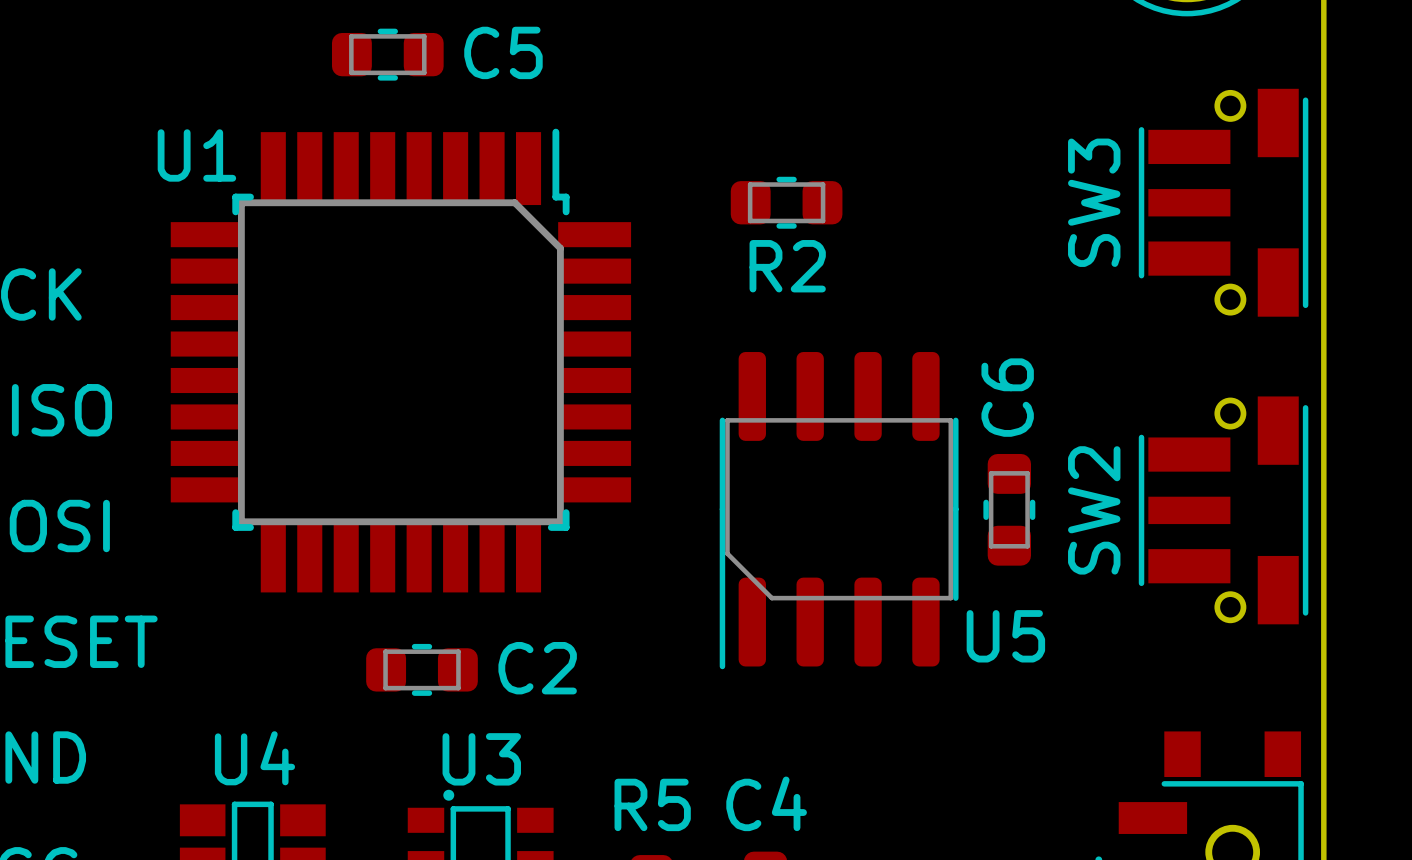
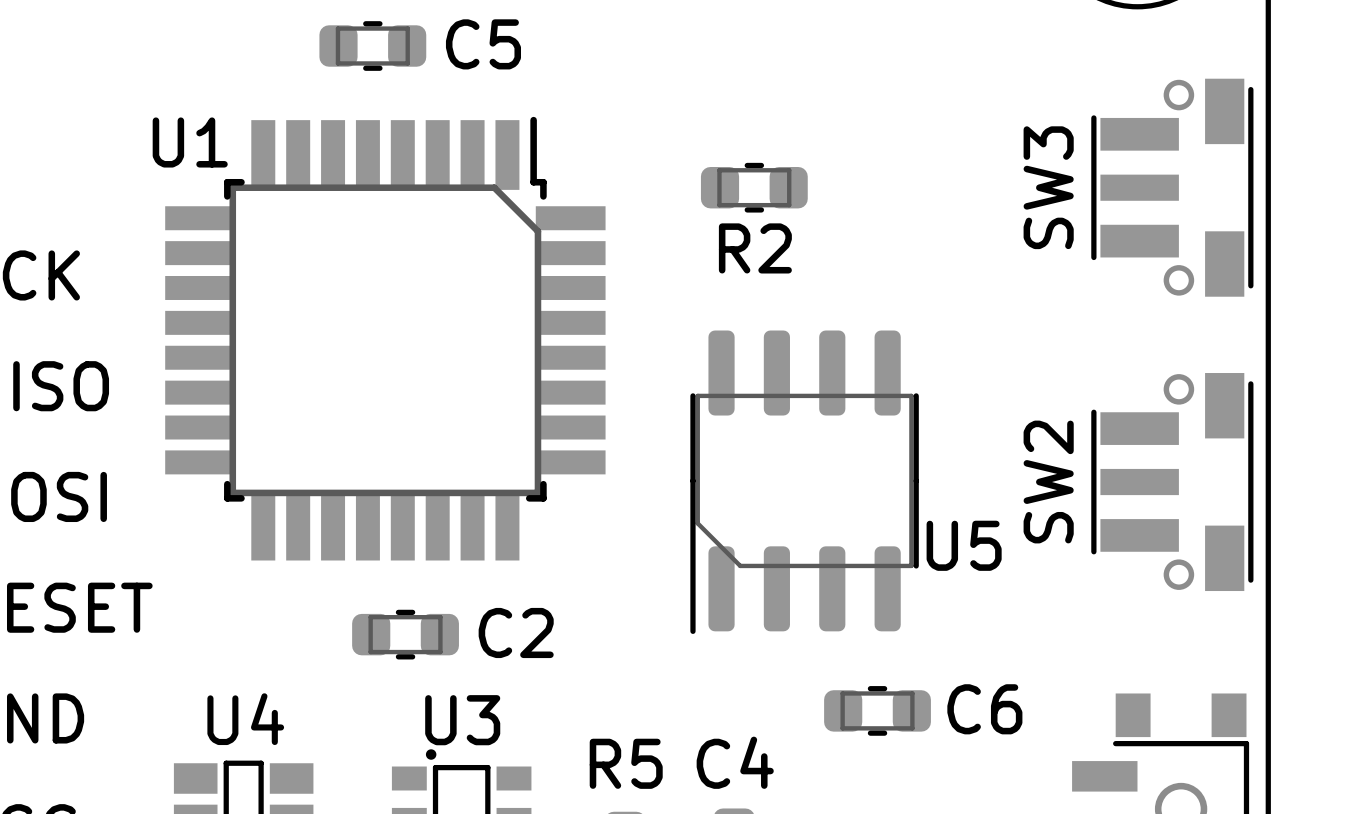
C6 rotation: 0° (1009, 509) -> 90° clockwise (877, 710)
C6 position: (1009, 509) -> (877, 710)
U5 name position: U5 (1005, 636) -> U5 (964, 545)

